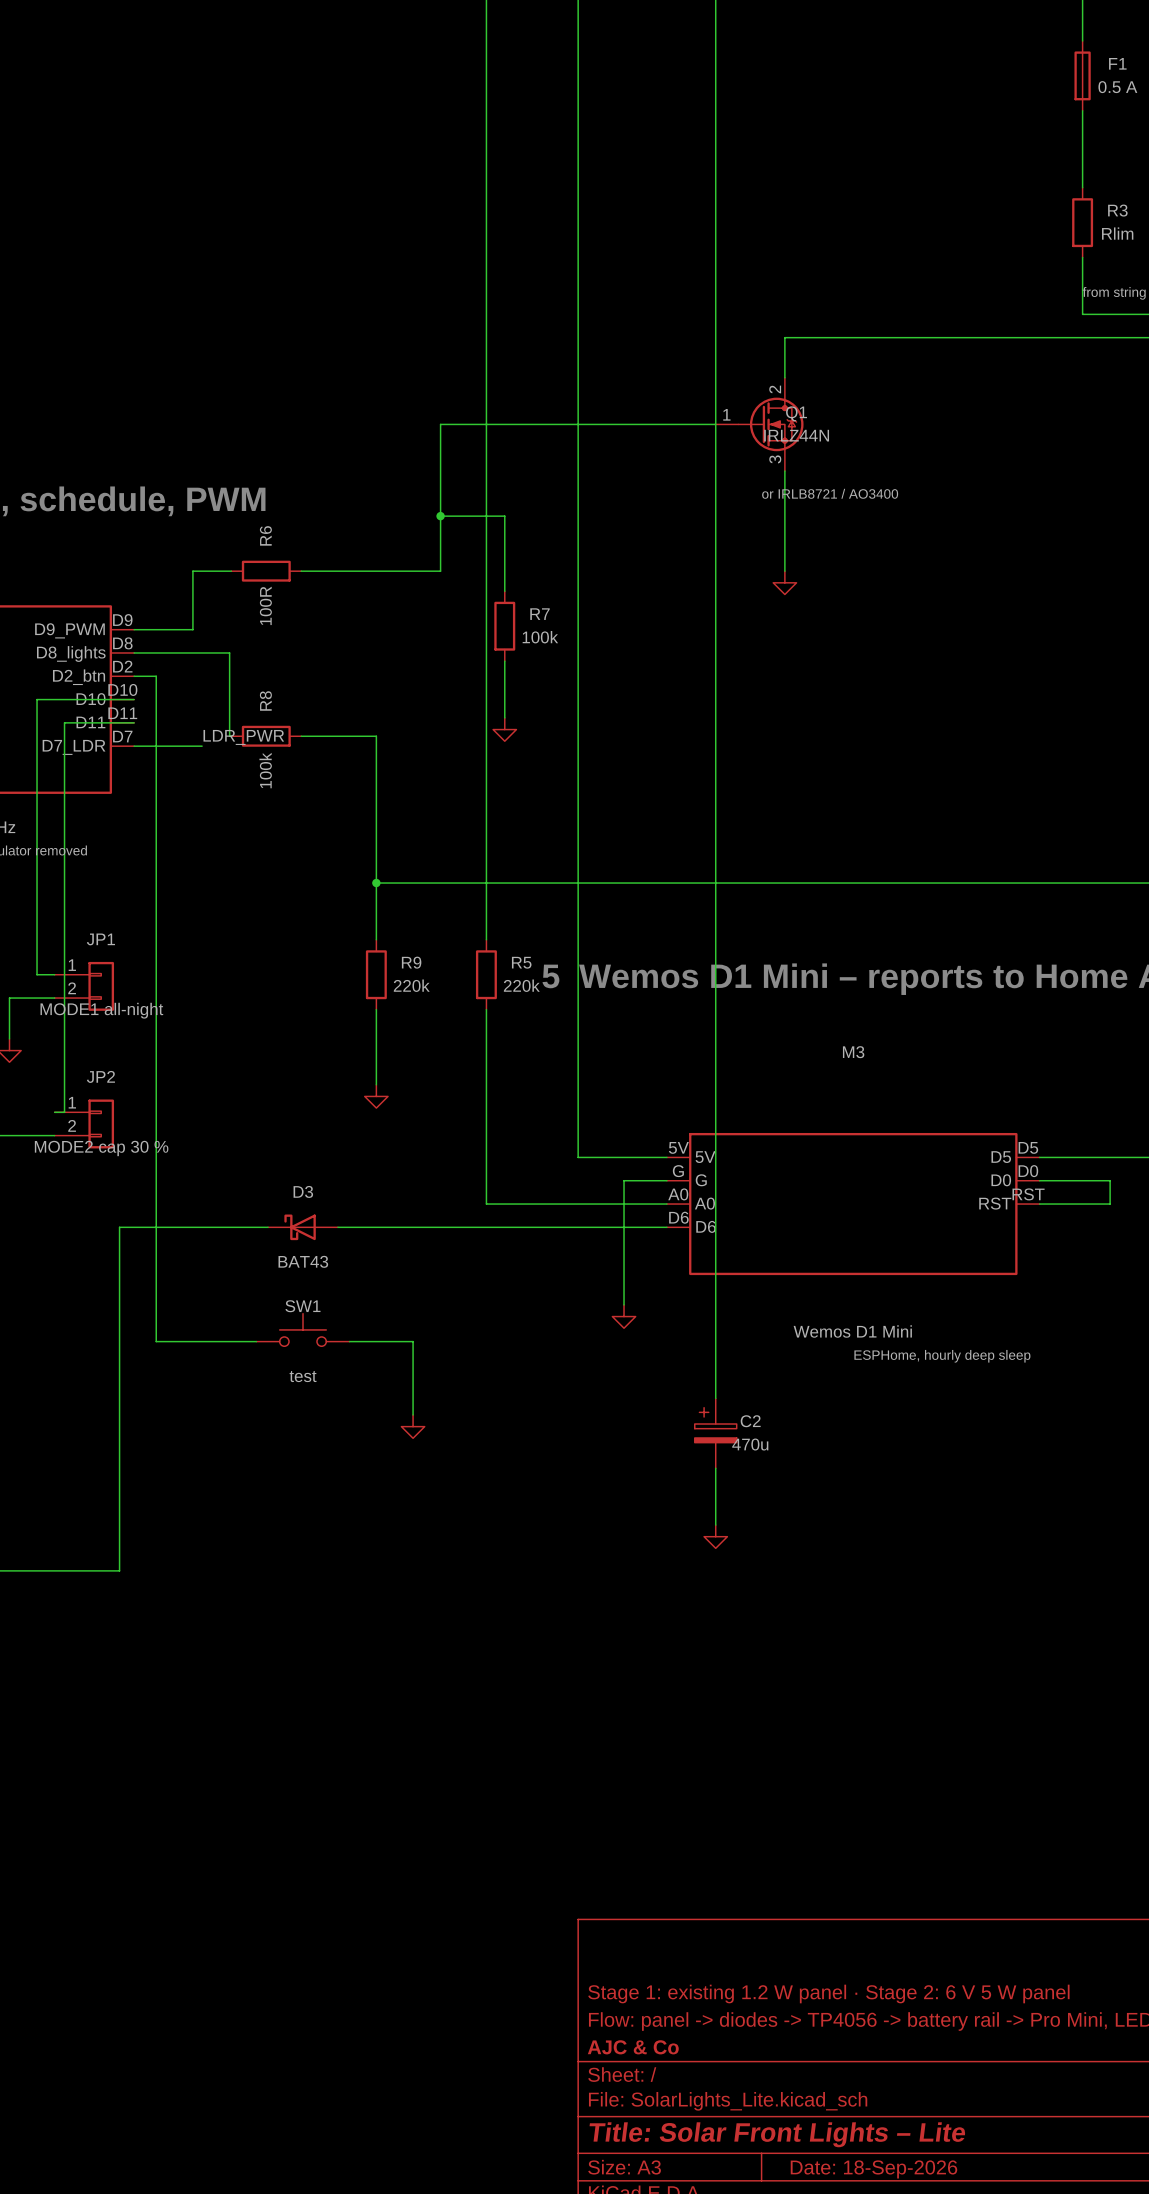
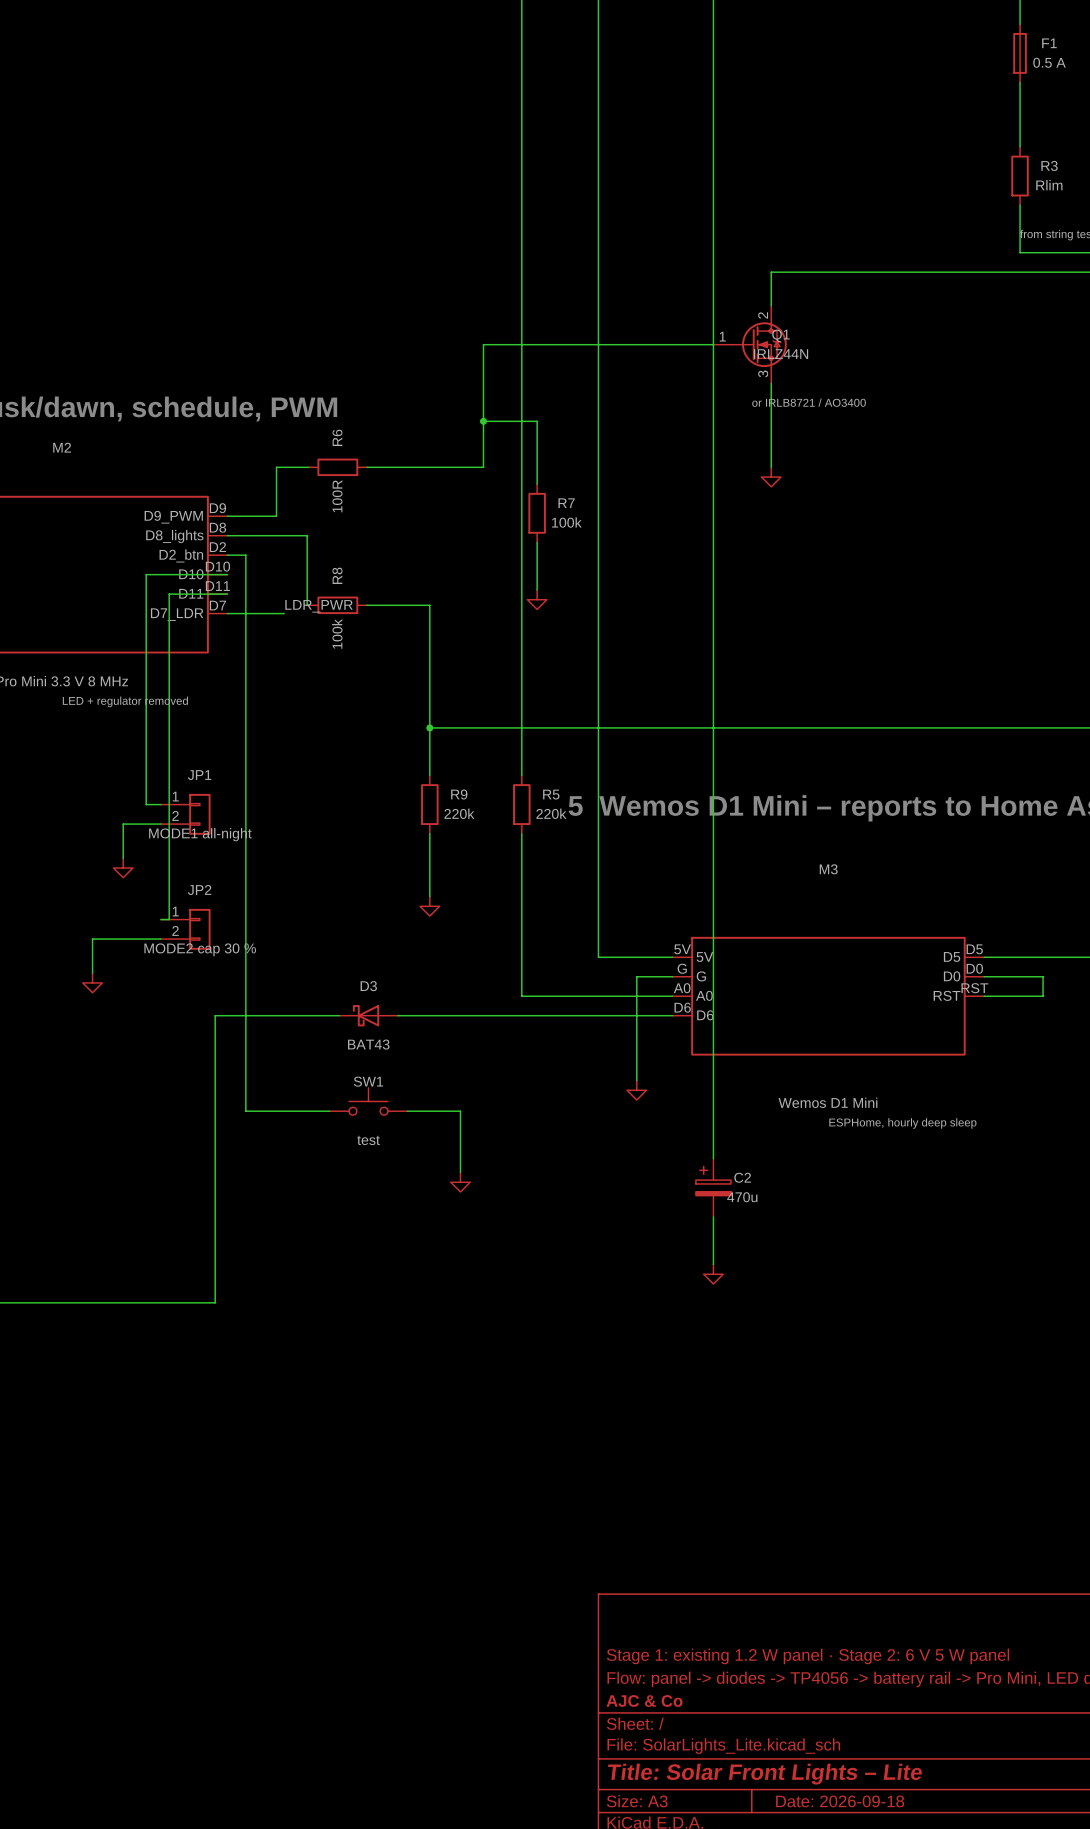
title block: Date: 18-Sep-2026 (873, 2169) -> Date: 2026-09-18 (840, 1801)

